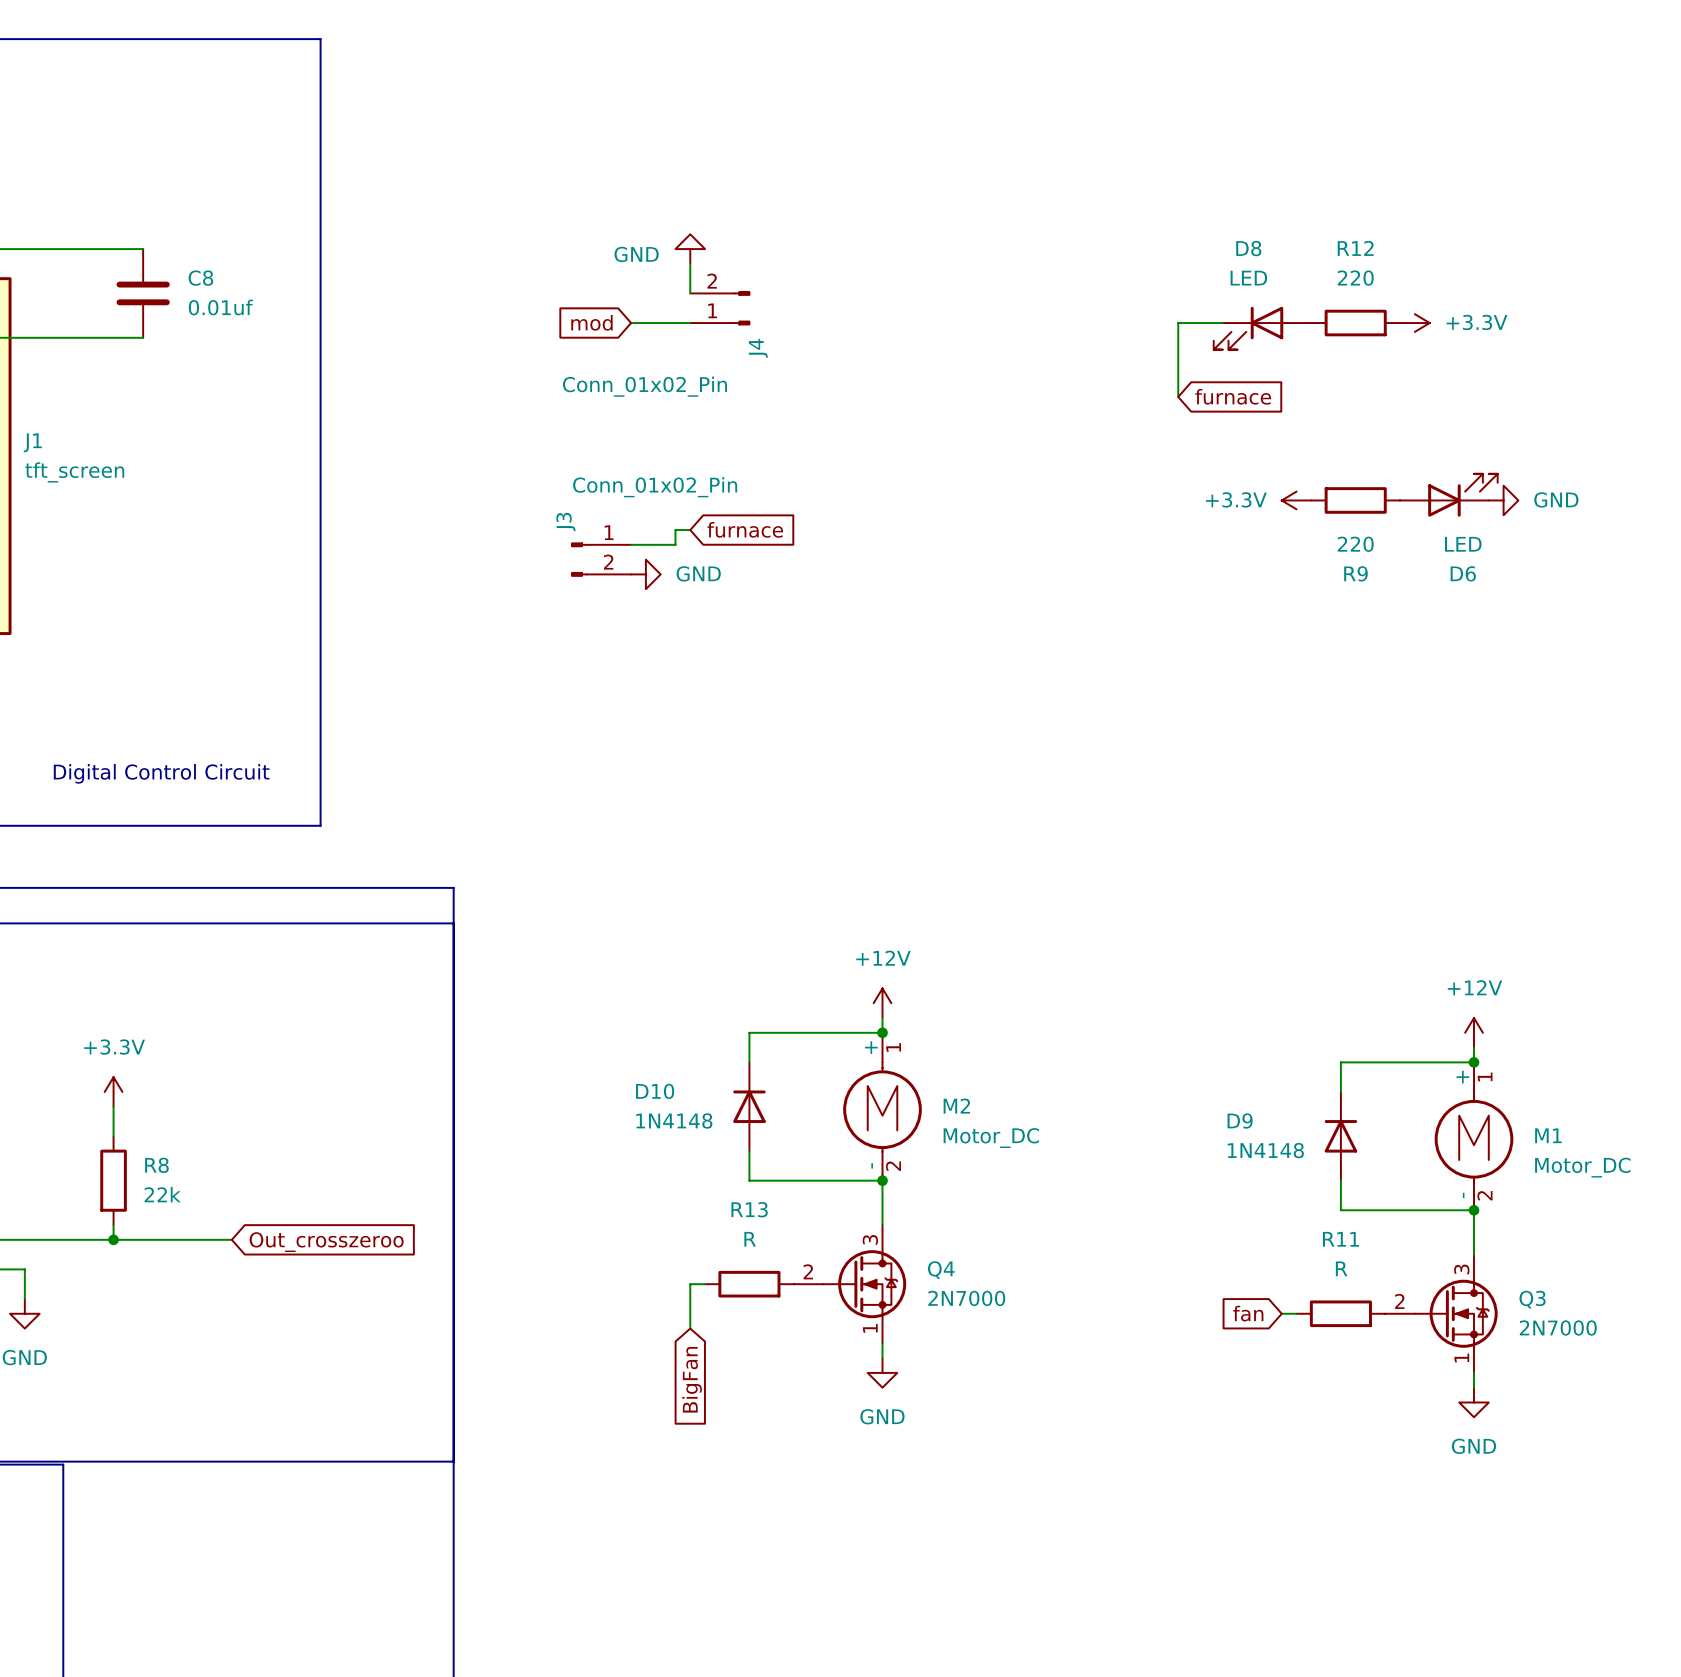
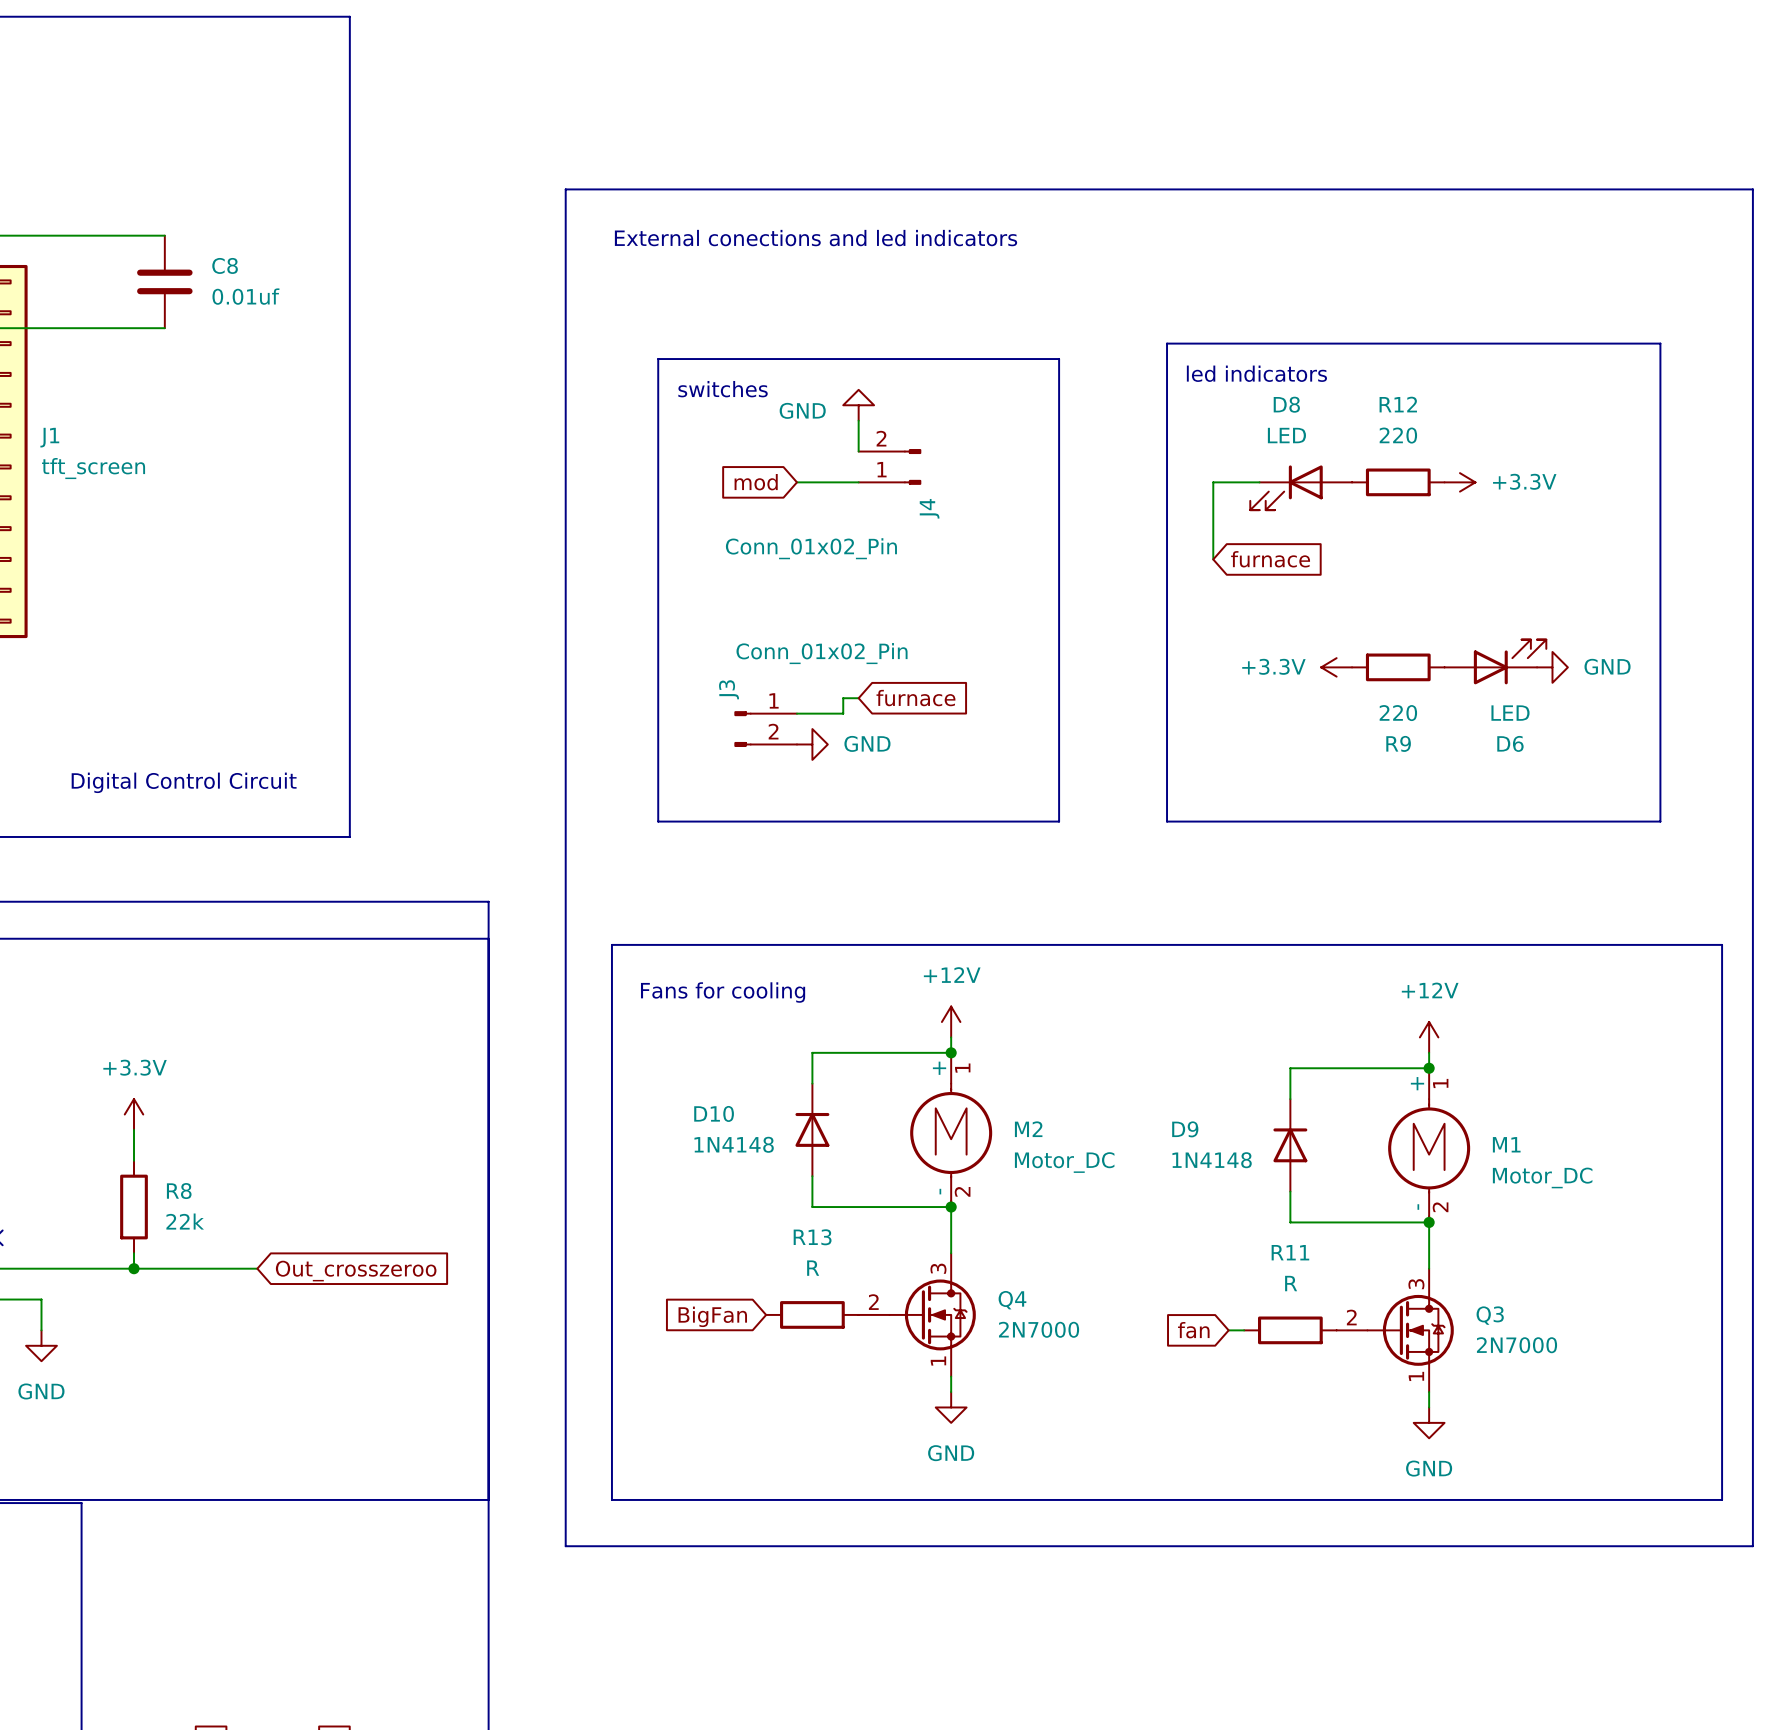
line: none -> (565, 189) (1752, 189) (1752, 1546) (565, 1546) (565, 189)
power symbol: GND (690, 249) -> none
text: none -> External conections and led indicators (816, 238)
wire: (690, 263) (690, 293) -> (858, 420) (858, 451)
J4 position: (720, 308) -> (889, 466)
global label position: mod (591, 322) -> mod (756, 482)
wire: (631, 323) (690, 323) -> (796, 482) (858, 482)
wire: (1222, 323) (1178, 323) (1178, 396) -> (1259, 482) (1213, 482) (1213, 559)
R12 position: (1355, 323) -> (1398, 482)
power symbol: +3.3V (1414, 323) -> none
D8 position: (1262, 328) -> (1301, 487)
line: none -> (1167, 343) (1660, 343) (1660, 821) (1167, 821) (1167, 343)
line: none -> (658, 359) (1059, 359) (1059, 821) (658, 821) (658, 359)
text: none -> led indicators (1256, 373)
text: none -> switches (723, 389)
global label position: furnace (1233, 396) -> furnace (1270, 559)
power symbol: none -> GND (858, 405)
power symbol: none -> +3.3V (1459, 482)
D6 position: (1448, 495) -> (1495, 661)
power symbol: +3.3V (1296, 500) -> none
R9 position: (1355, 500) -> (1398, 667)
power symbol position: GND (1503, 500) -> GND (1552, 667)
global label position: furnace (745, 529) -> furnace (915, 698)
wire: (690, 530) (675, 530) (675, 544) (631, 544) -> (858, 698) (843, 698) (843, 713) (796, 713)
J3 position: (601, 559) -> (765, 729)
power symbol: GND (645, 574) -> none
power symbol: none -> +3.3V (1336, 667)
power symbol: none -> GND (812, 744)
line: none -> (611, 944) (1722, 944) (1722, 1499) (611, 1499) (611, 944)
text: none -> Fans for cooling (723, 992)
power symbol position: +12V (882, 1003) -> +12V (951, 1022)
wire: (882, 1018) (882, 1032) -> (951, 1037) (951, 1052) (935, 1052)
wire: (764, 1032) (749, 1032) (749, 1062) -> (812, 1052) (812, 1083)
junction position: (882, 1032) -> (951, 1052)
power symbol position: +12V (1474, 1032) -> +12V (1429, 1037)
junction: none -> (1429, 1068)
wire: (1474, 1047) (1474, 1062) (1340, 1062) (1340, 1091) -> (1429, 1052) (1429, 1068) (1290, 1068) (1290, 1099)
junction: (1474, 1062) -> none
D10 position: (749, 1106) -> (812, 1129)
M2 position: (882, 1106) -> (951, 1129)
D9 position: (1340, 1136) -> (1290, 1145)
M1 position: (1474, 1136) -> (1429, 1145)
wire: (749, 1151) (749, 1180) (764, 1180) -> (812, 1176) (812, 1207)
wire: (882, 1180) (882, 1225) -> (935, 1207) (951, 1207) (951, 1253)
junction position: (882, 1180) -> (951, 1207)
wire: (1340, 1180) (1340, 1210) (1474, 1210) (1474, 1254) -> (1290, 1191) (1290, 1222) (1429, 1222) (1429, 1268)
junction: none -> (1429, 1222)
junction: (1474, 1210) -> none
wire: (705, 1284) (690, 1284) (690, 1328) -> none
R13 position: (749, 1284) -> (812, 1314)
Q4 position: (849, 1284) -> (917, 1314)
global label position: fan (1248, 1313) -> fan (1193, 1330)
wire: (1281, 1313) (1296, 1313) -> (1228, 1330) (1244, 1330)
R11 position: (1340, 1313) -> (1290, 1330)
Q3 position: (1441, 1313) -> (1395, 1330)
wire: (882, 1343) (882, 1358) -> (951, 1376) (951, 1392)
power symbol position: GND (882, 1372) -> GND (951, 1407)
wire: (1474, 1372) (1474, 1387) -> (1429, 1392) (1429, 1407)
global label rotation: 0° (692, 1379) -> 90° clockwise (712, 1316)
power symbol position: GND (1474, 1402) -> GND (1429, 1422)

